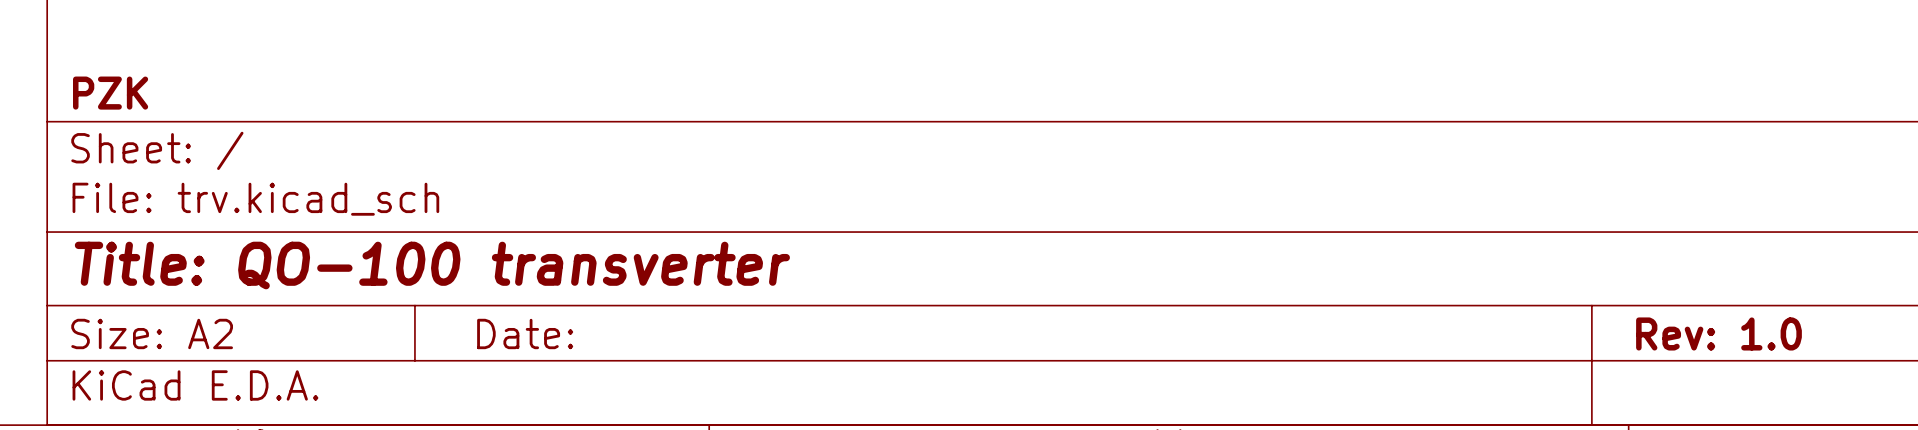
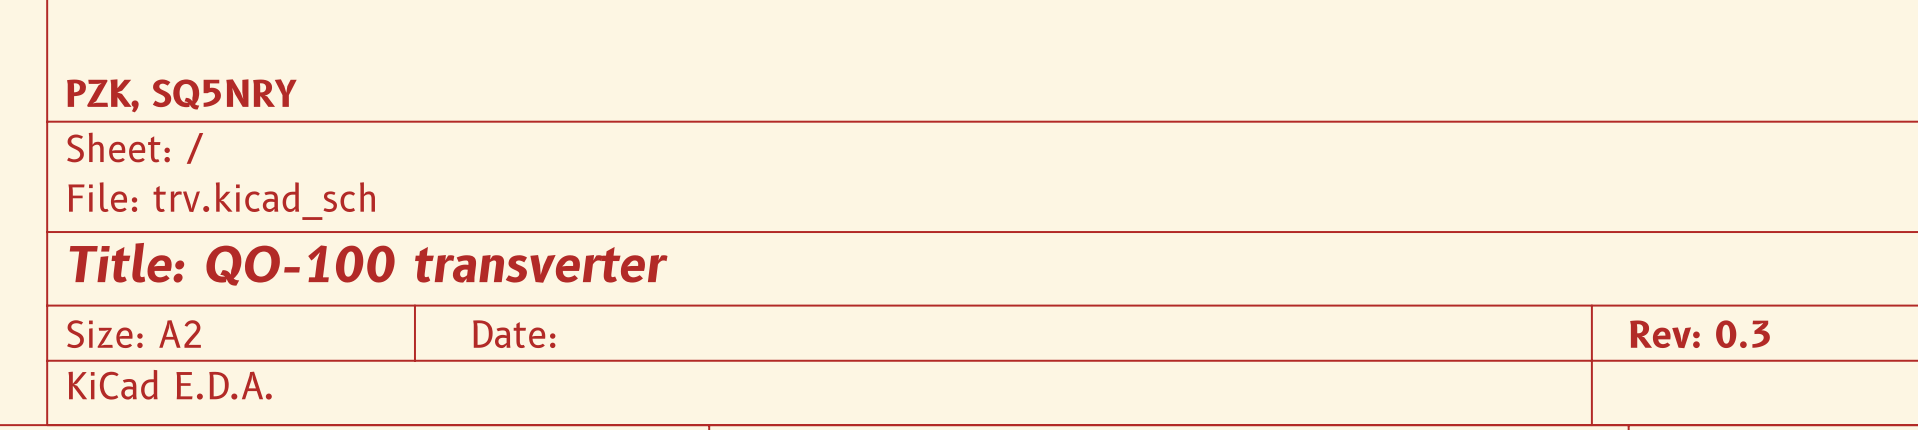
title block: PZK (110, 93) -> PZK, SQ5NRY (181, 95)
title block: Rev: 1.0 (1718, 333) -> Rev: 0.3 (1700, 334)

